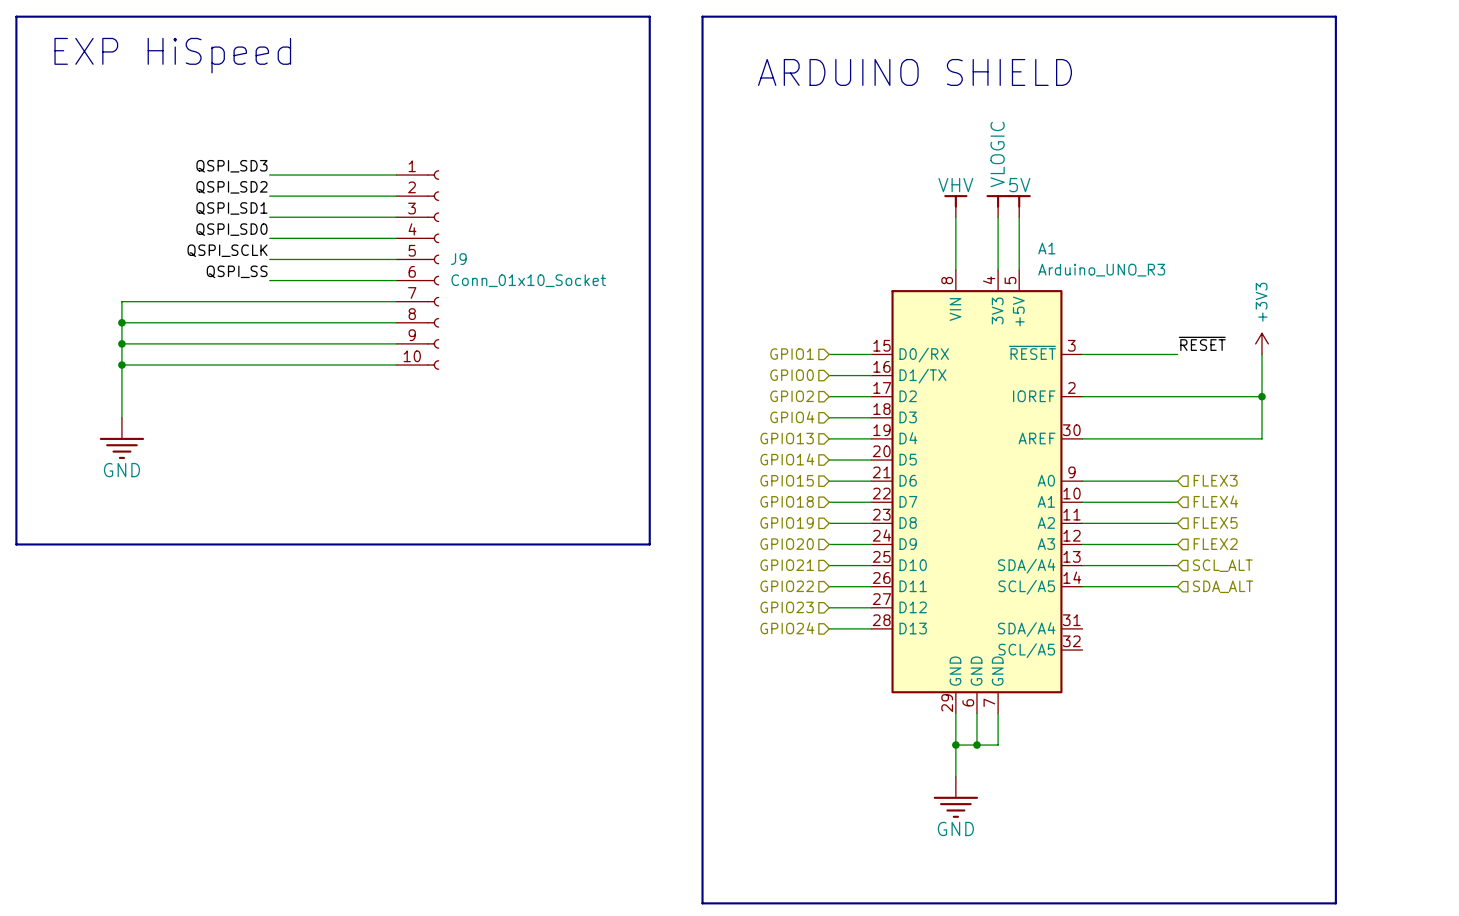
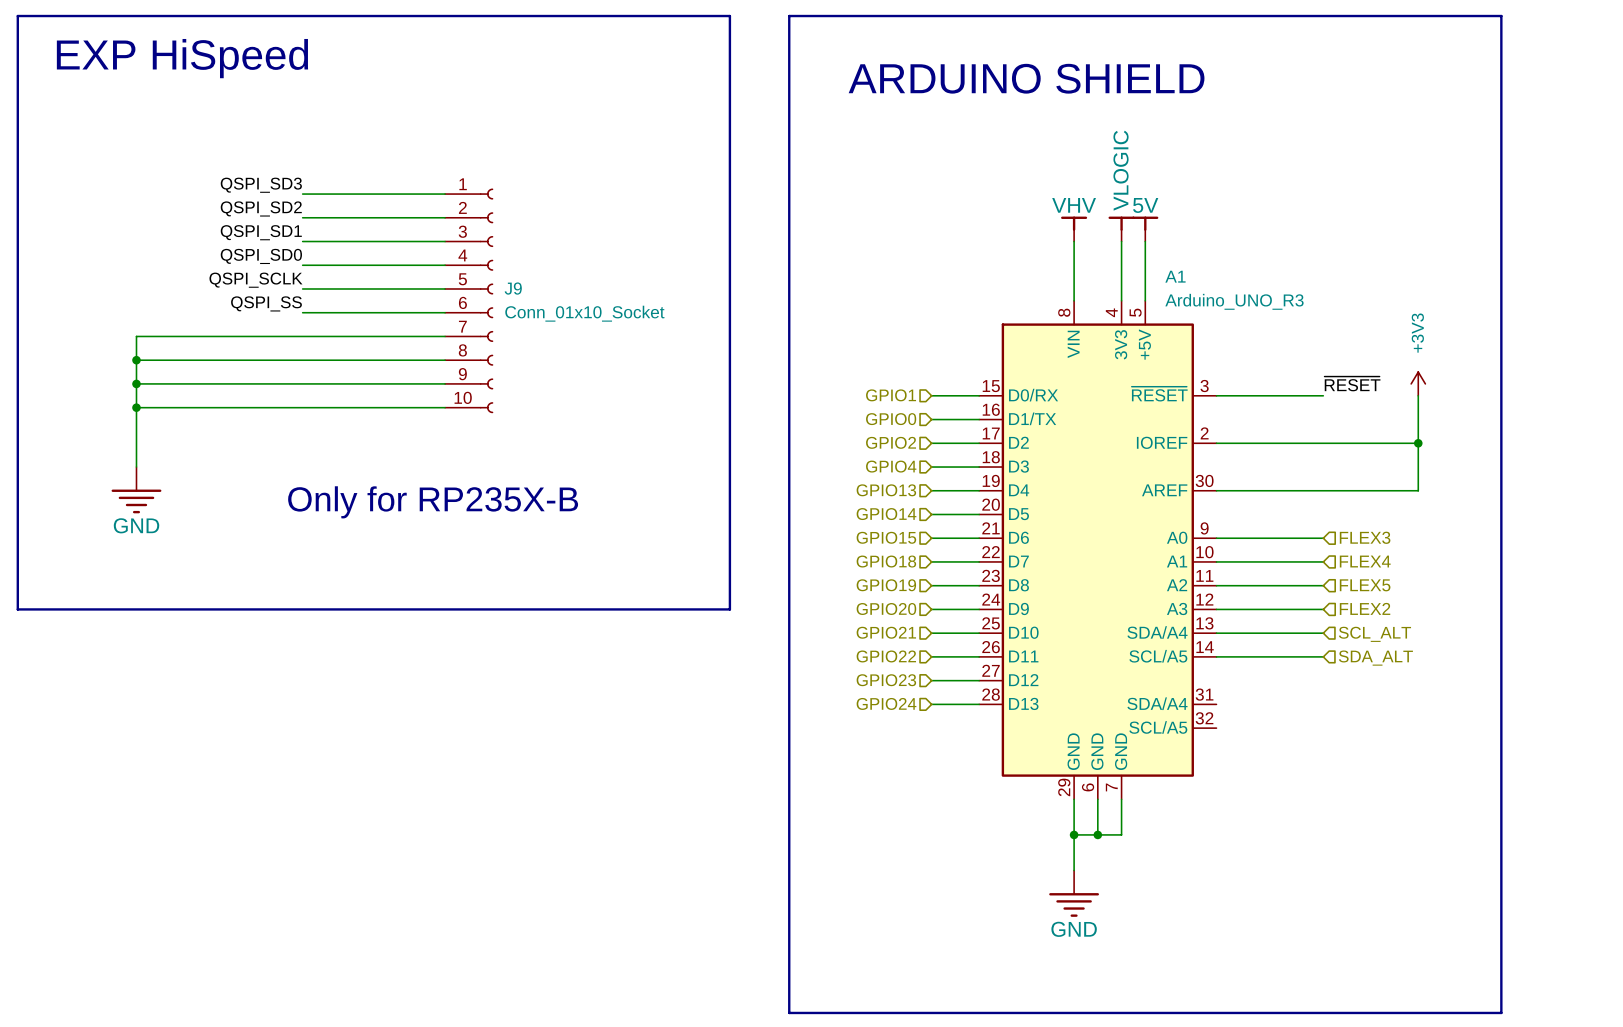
text: none -> Only for RP235X-B (433, 502)

